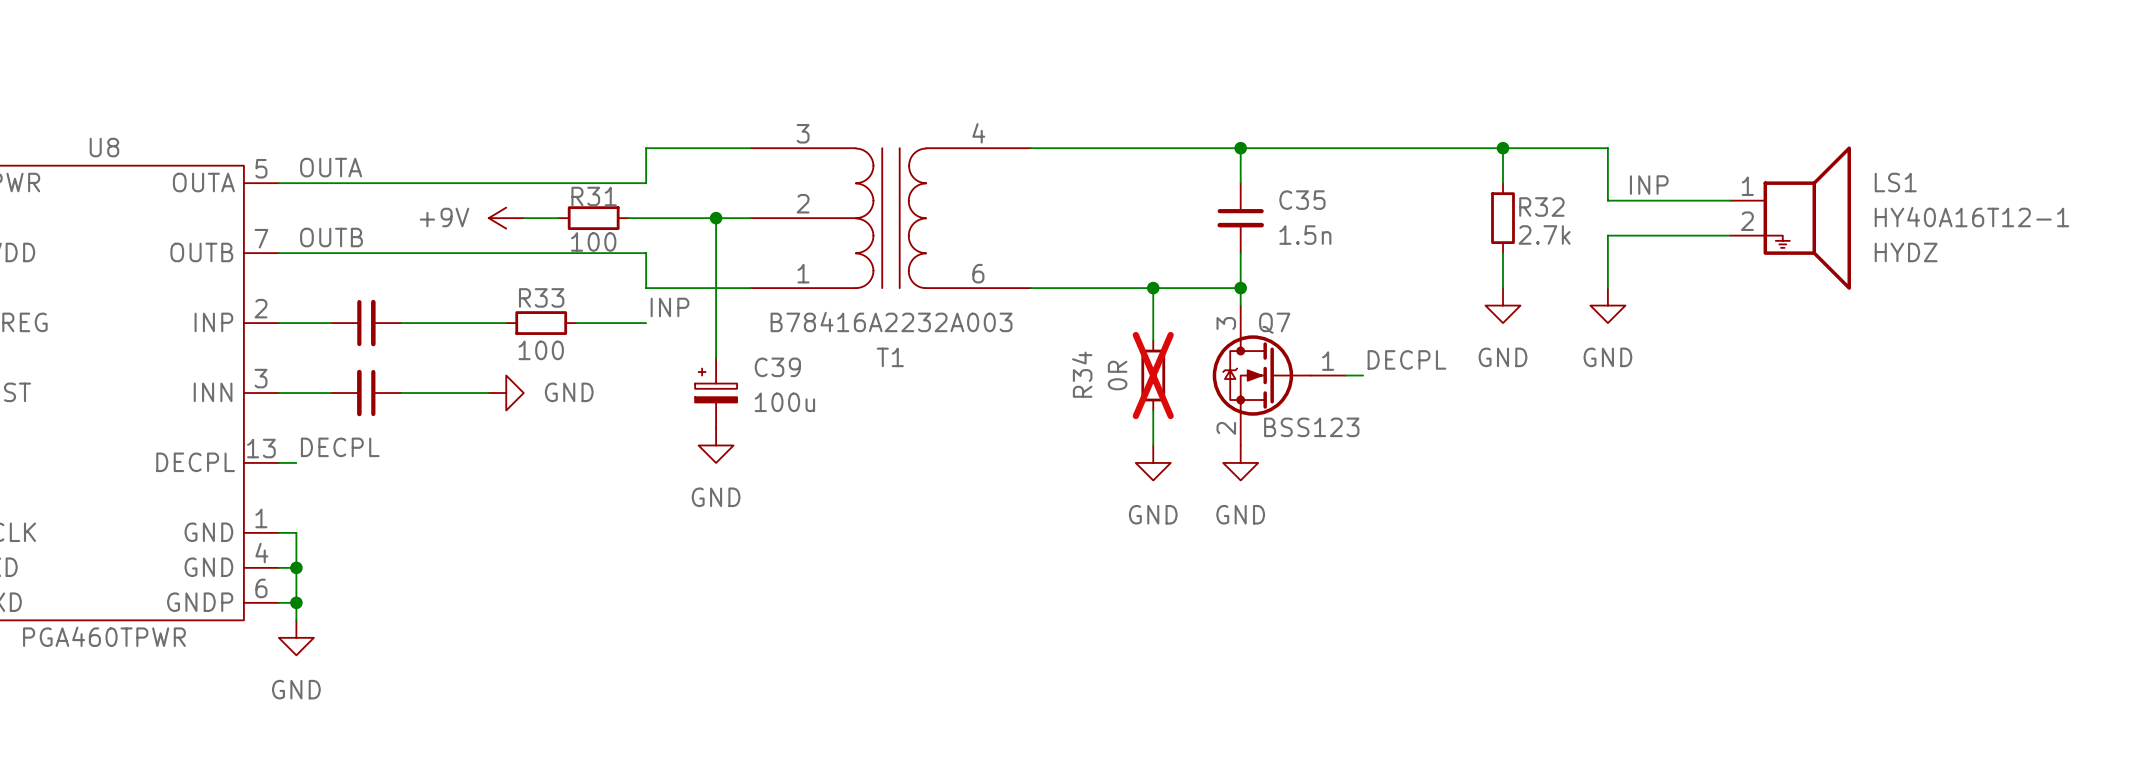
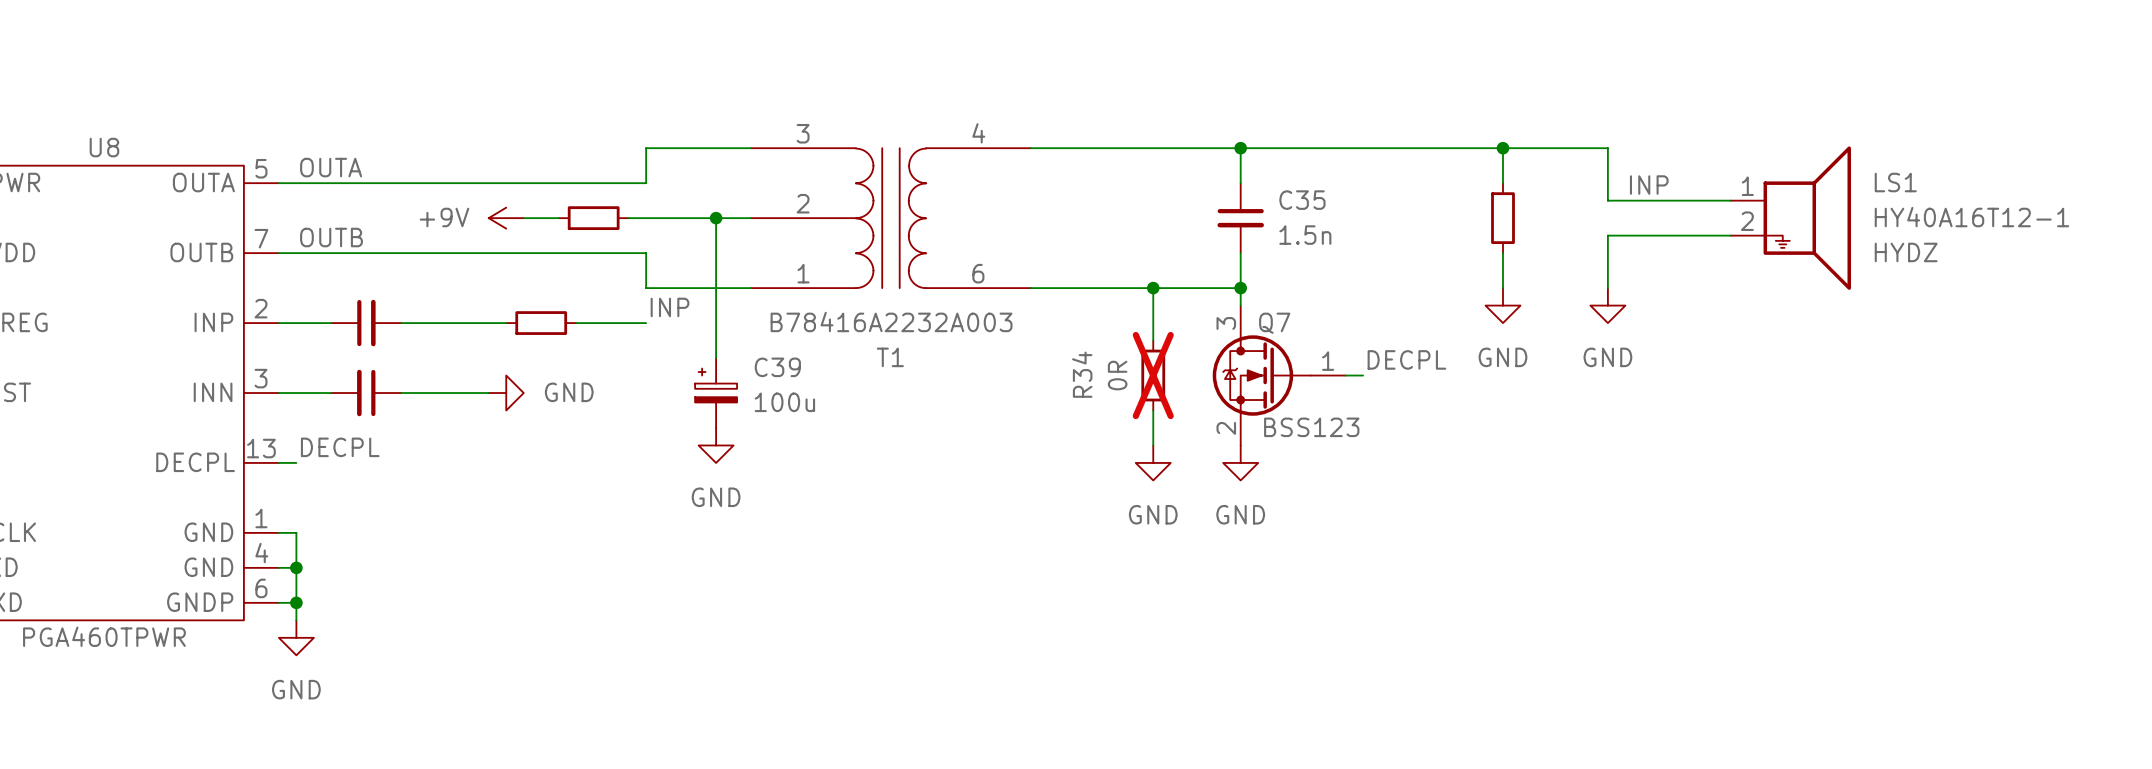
R31 name: R31 (594, 196) -> none
R32 name: R32 (1541, 206) -> none
R32 value: 2.7k (1544, 234) -> none
R31 value: 100 (593, 241) -> none
R33 name: R33 (541, 297) -> none
R33 value: 100 (541, 350) -> none

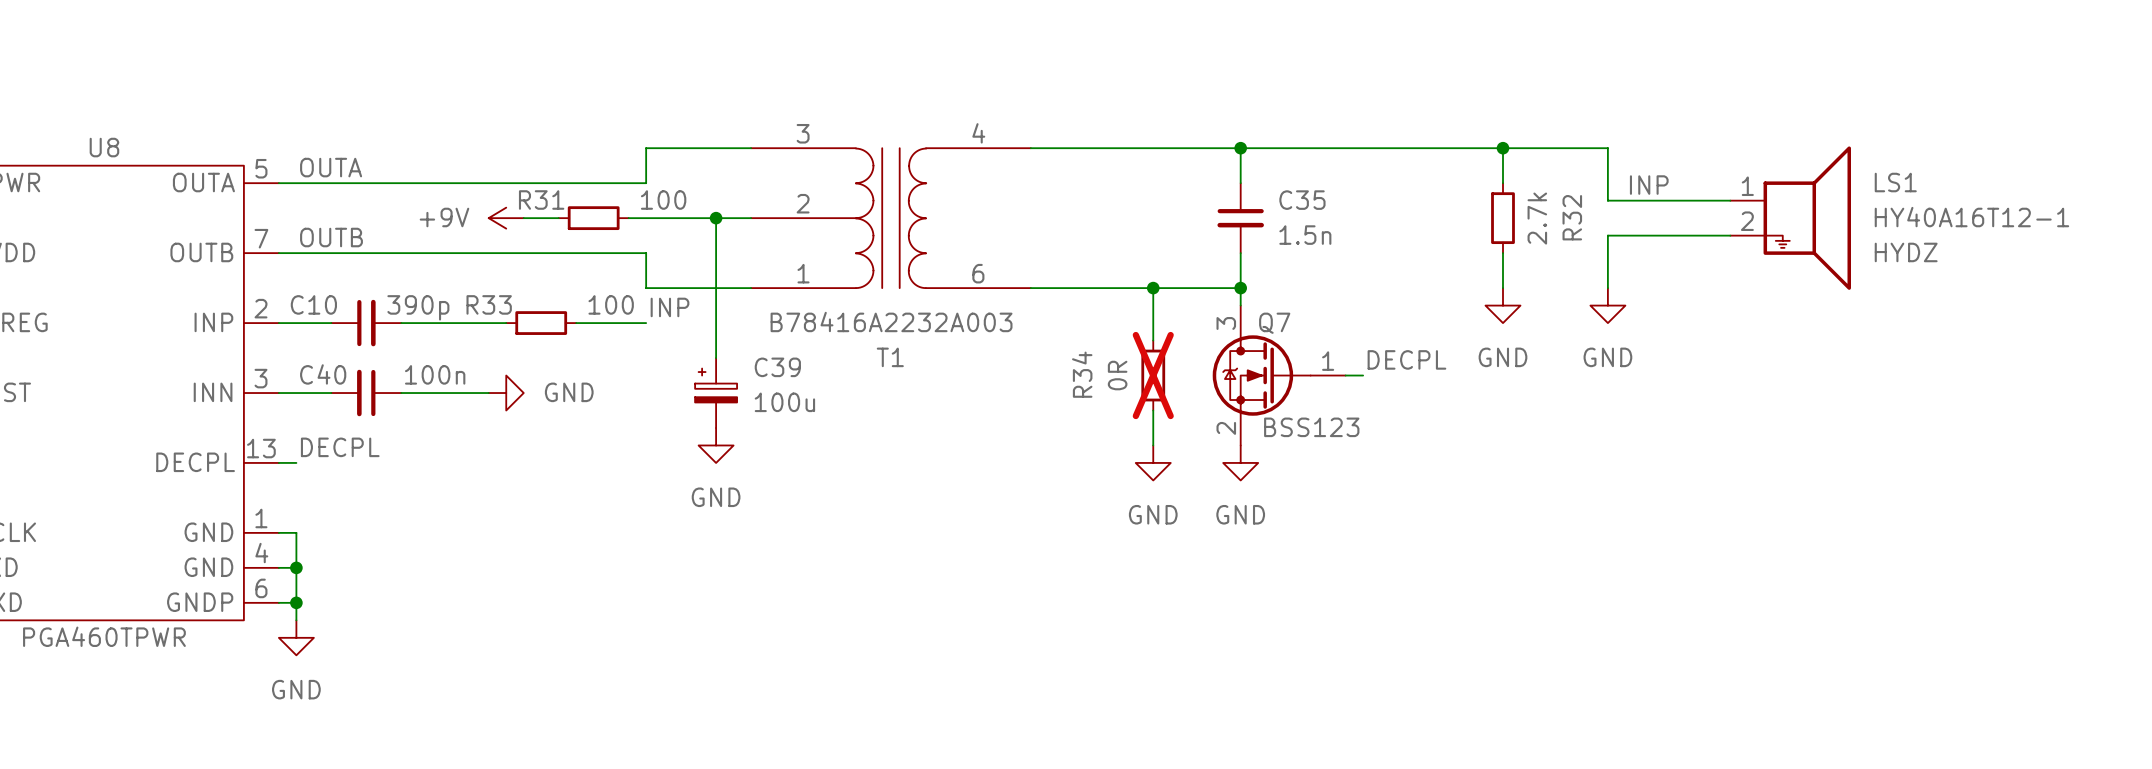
R31 name: none -> R31 (541, 200)
R31 value: none -> 100 (663, 200)
R32 name: none -> R32 (1572, 217)
R32 value: none -> 2.7k (1537, 218)
C10 name: none -> C10 (313, 304)
R33 name: none -> R33 (489, 304)
R33 value: none -> 100 (611, 304)
C10 value: none -> 390p (418, 307)
C40 name: none -> C40 (323, 374)
C40 value: none -> 100n (435, 374)

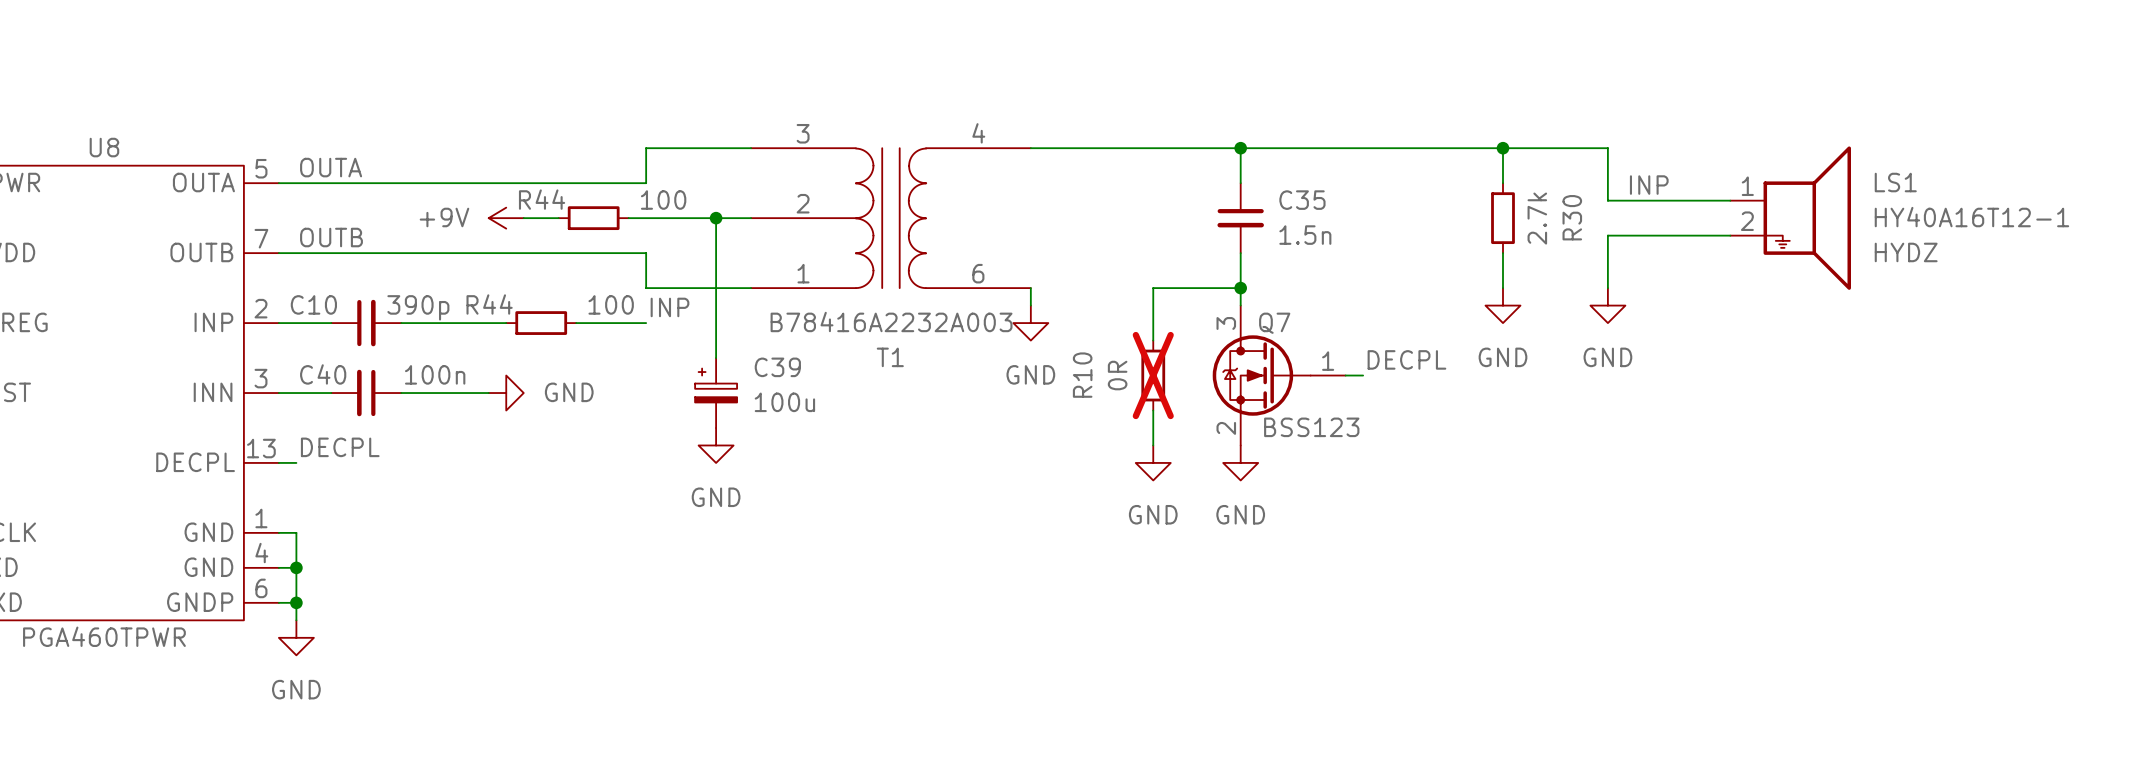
R31 name: R31 (541, 200) -> R44 (542, 199)
R32 name: R32 (1572, 217) -> R30 (1572, 217)
wire: (1030, 288) (1153, 288) -> (1030, 288) (1030, 305)
junction: (1153, 288) -> none
R33 name: R33 (489, 304) -> R44 (489, 304)
power symbol: none -> GND (1030, 323)
R34 name: R34 (1082, 374) -> R10 (1082, 375)

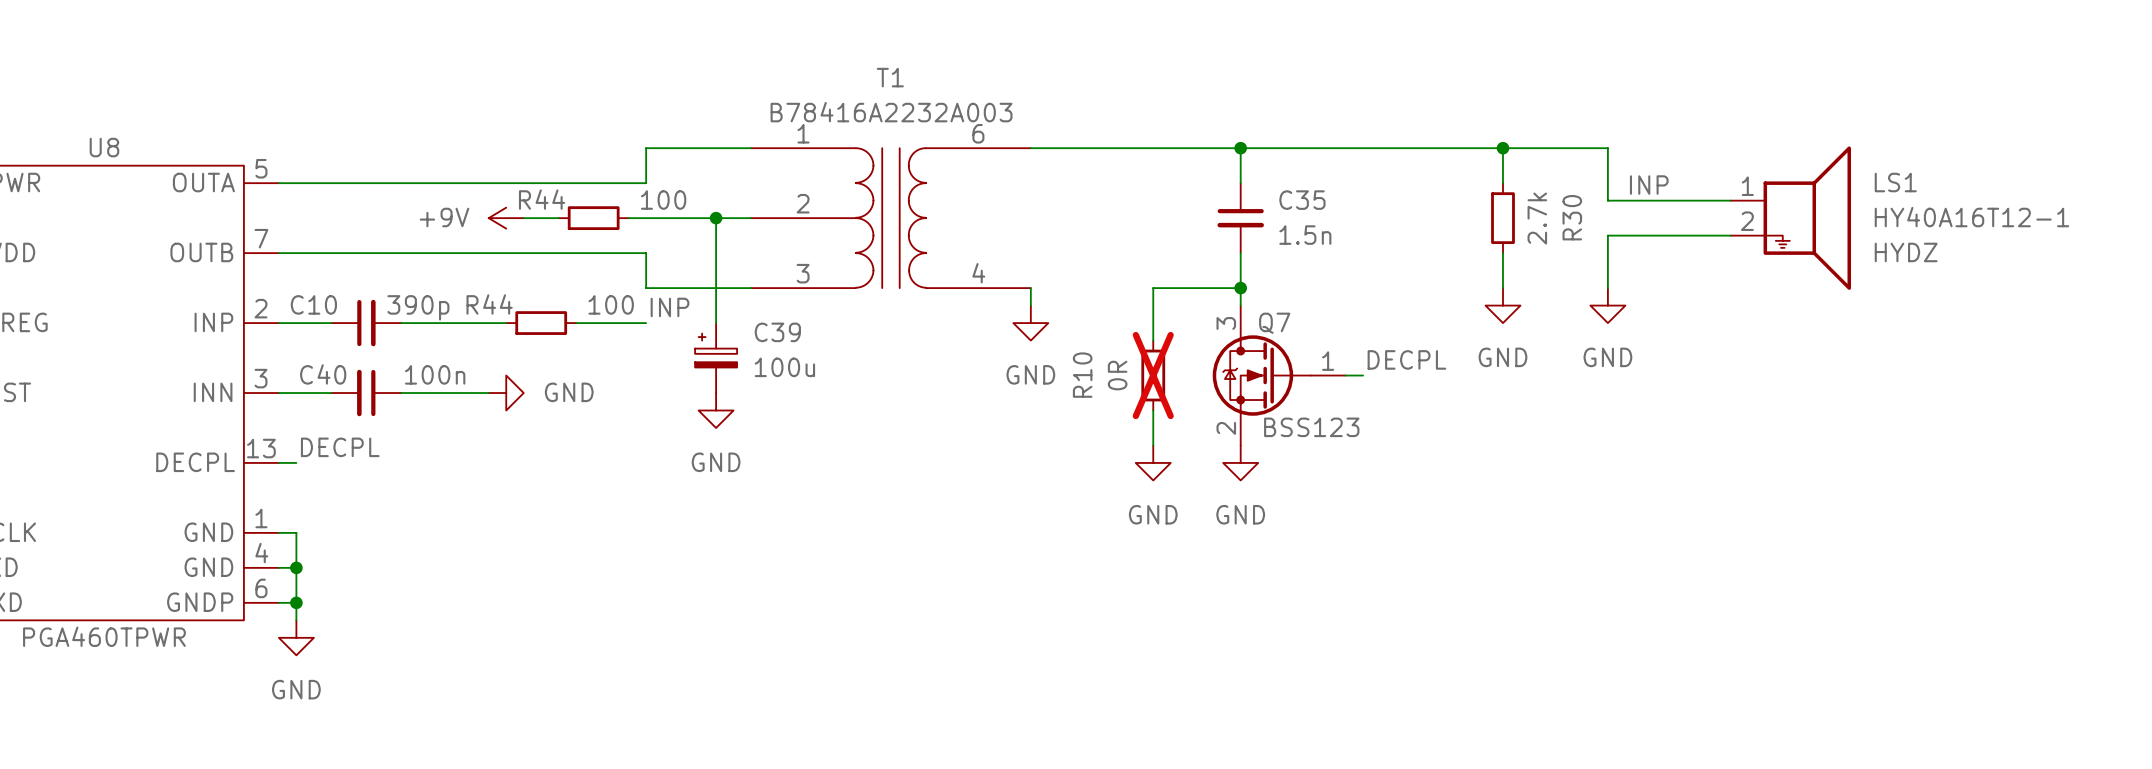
label: OUTA (331, 167) -> none
T1 flip: as is (891, 218) -> up-down (891, 218)
label: OUTB (331, 237) -> none
C39 position: (716, 393) -> (716, 358)
power symbol position: GND (716, 445) -> GND (716, 410)

